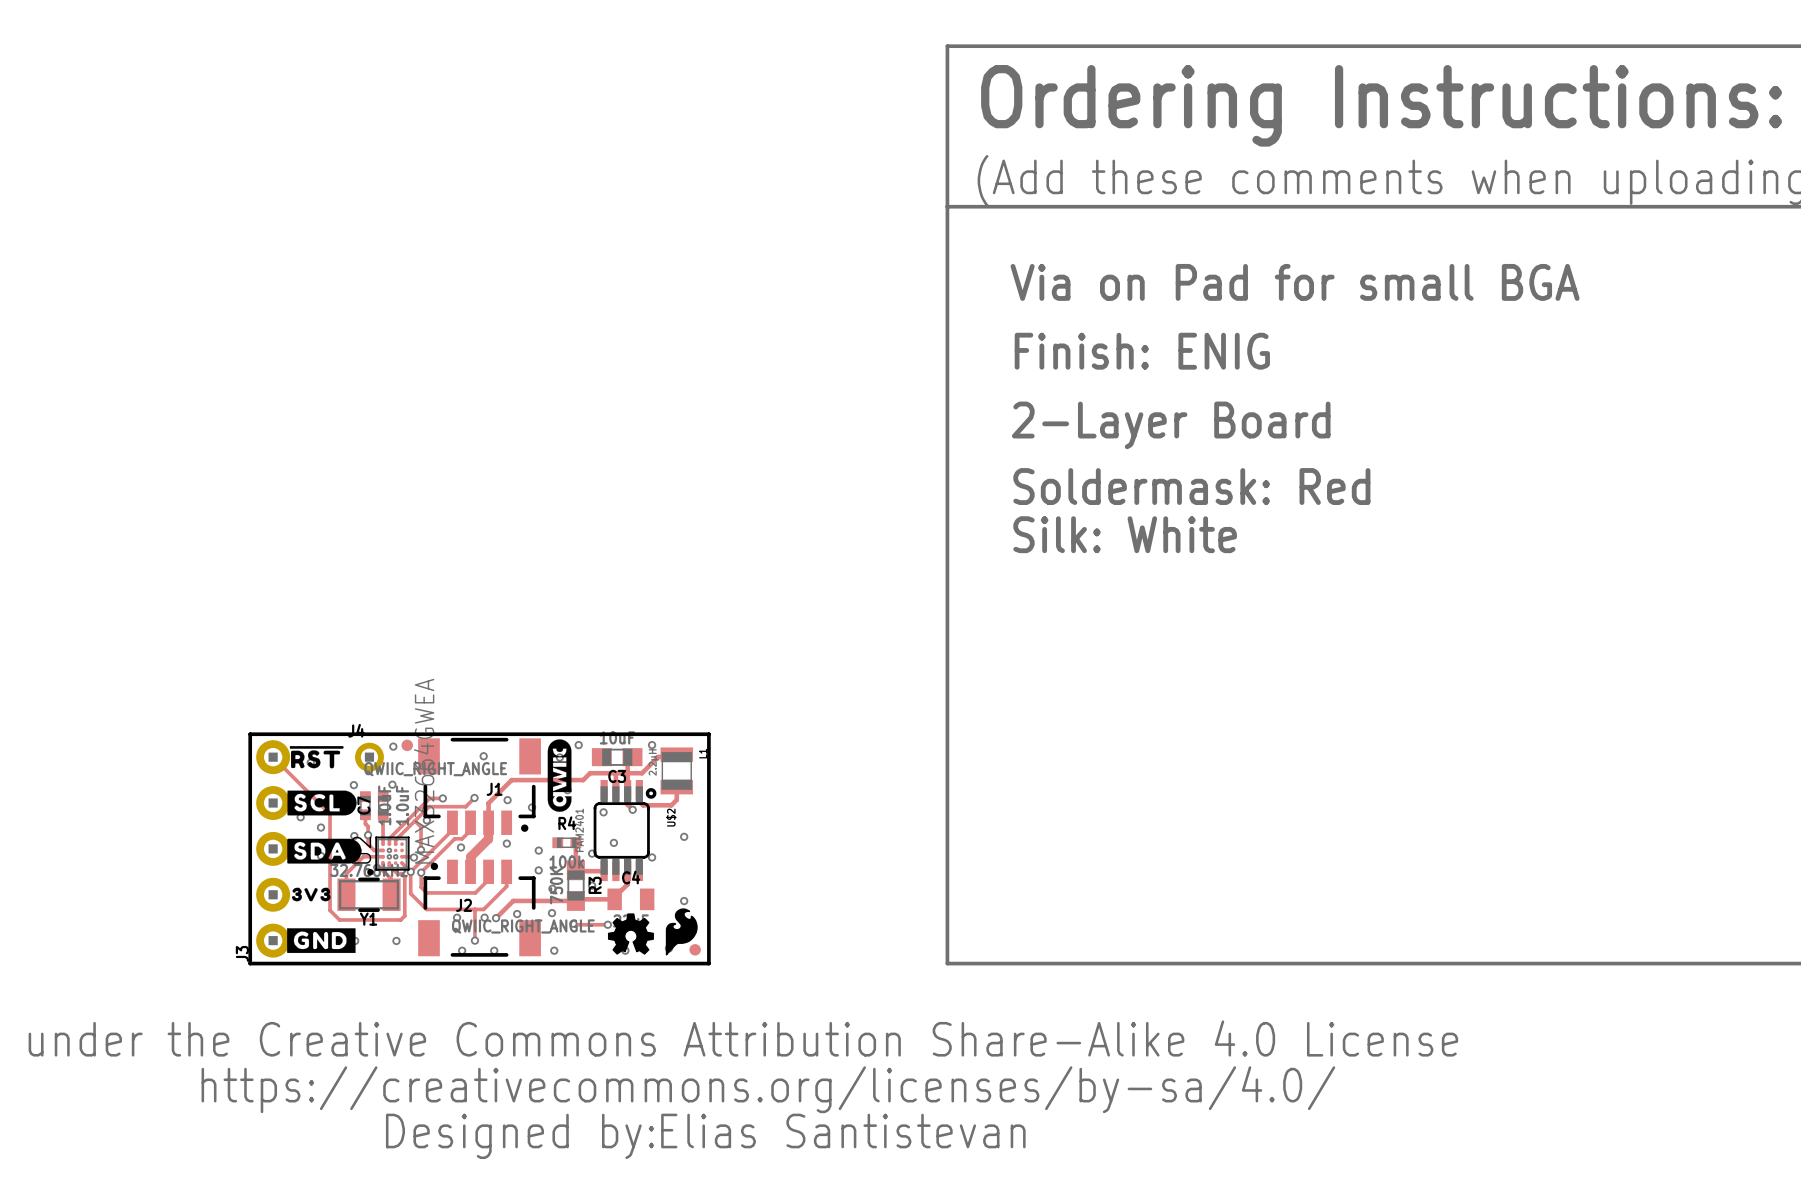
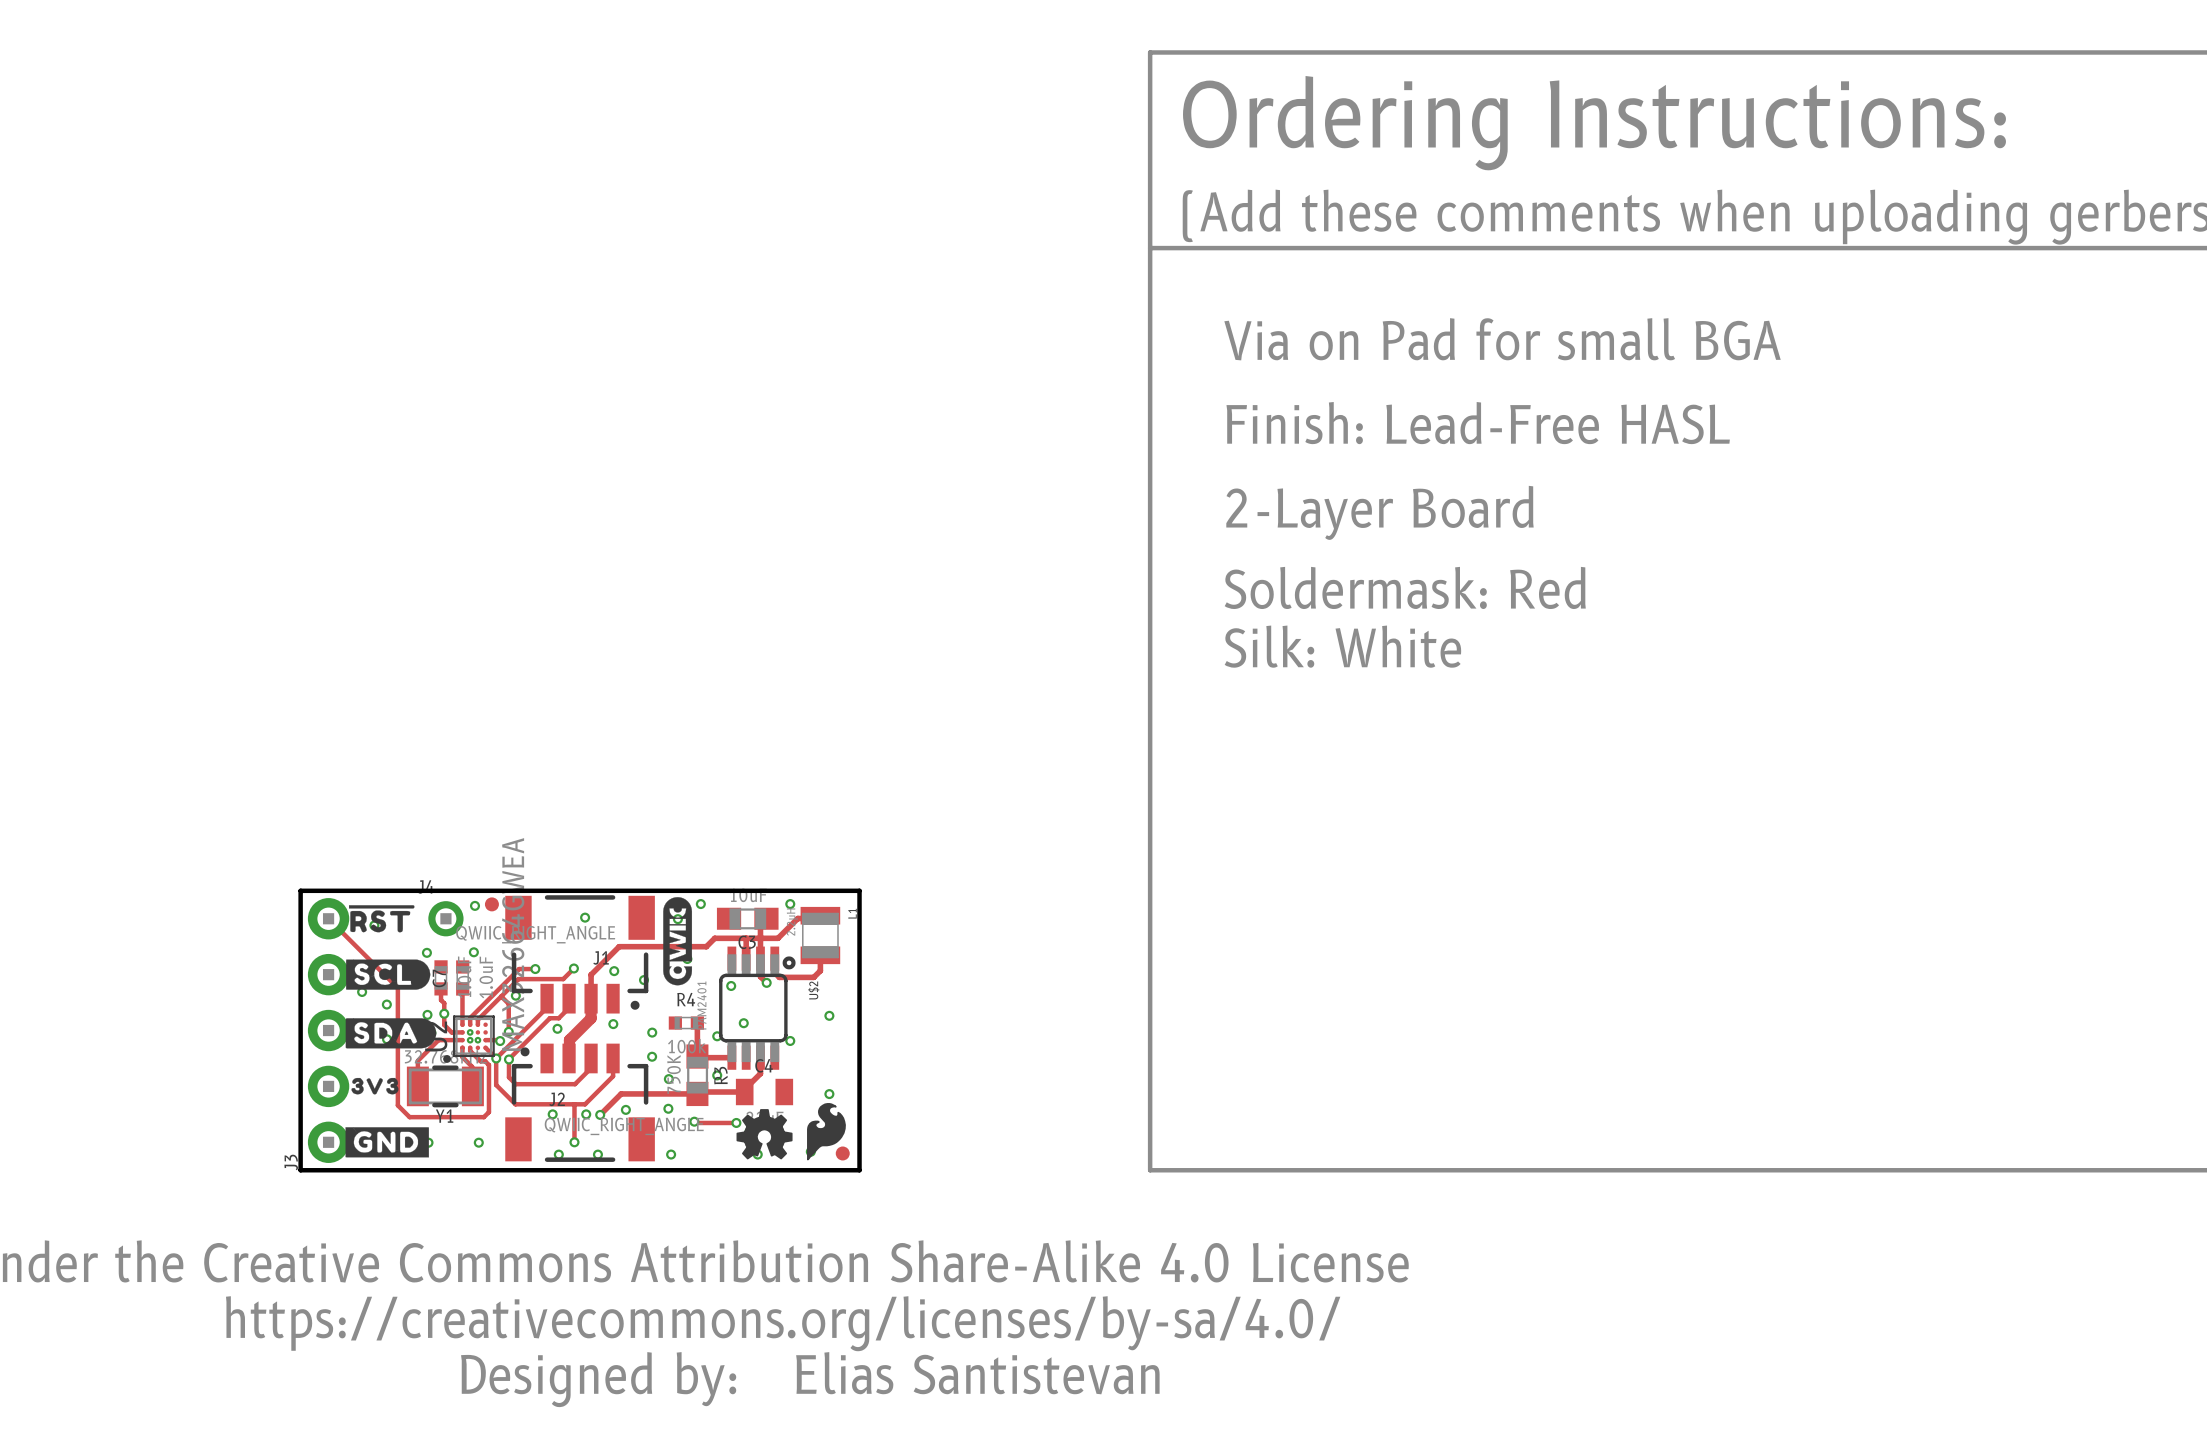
text: Finish: ENIG (1142, 351) -> Finish: Lead-Free HASL (1478, 423)

